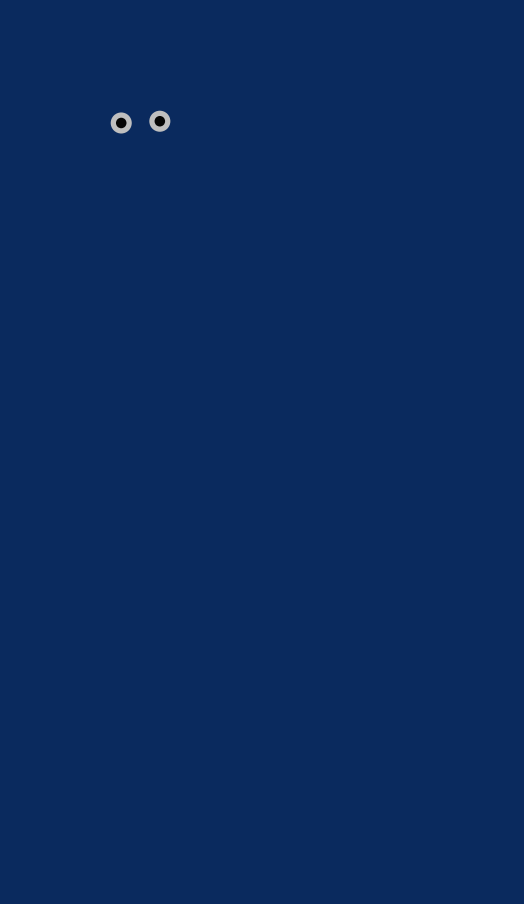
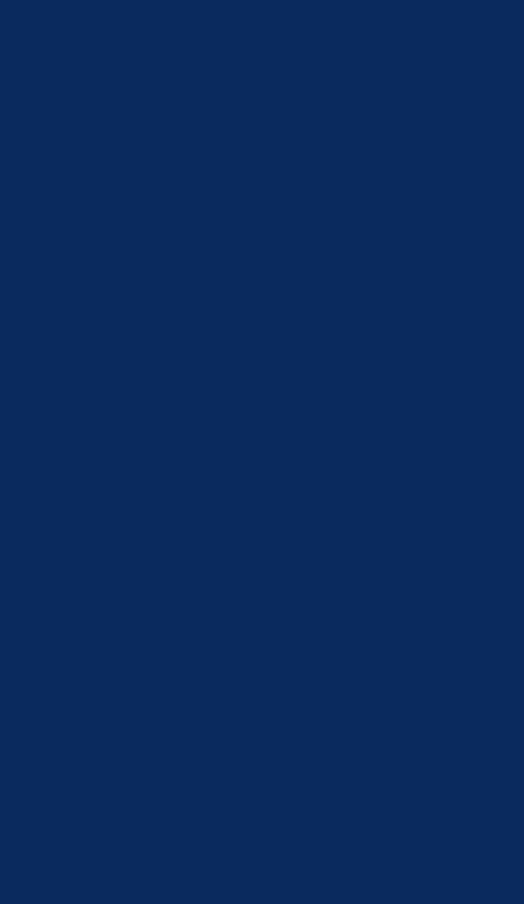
via: (159, 121) -> none
via: (121, 122) -> none

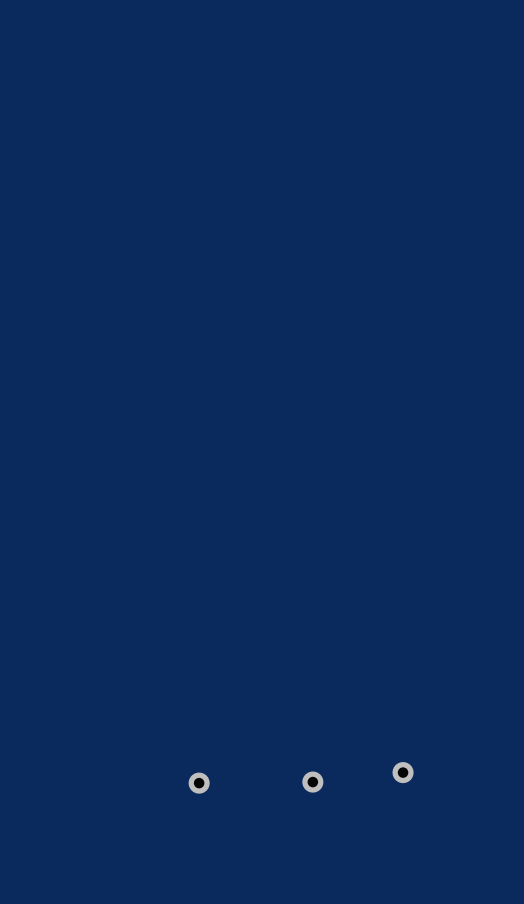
via: none -> (403, 772)
via: none -> (312, 782)
via: none -> (199, 783)

